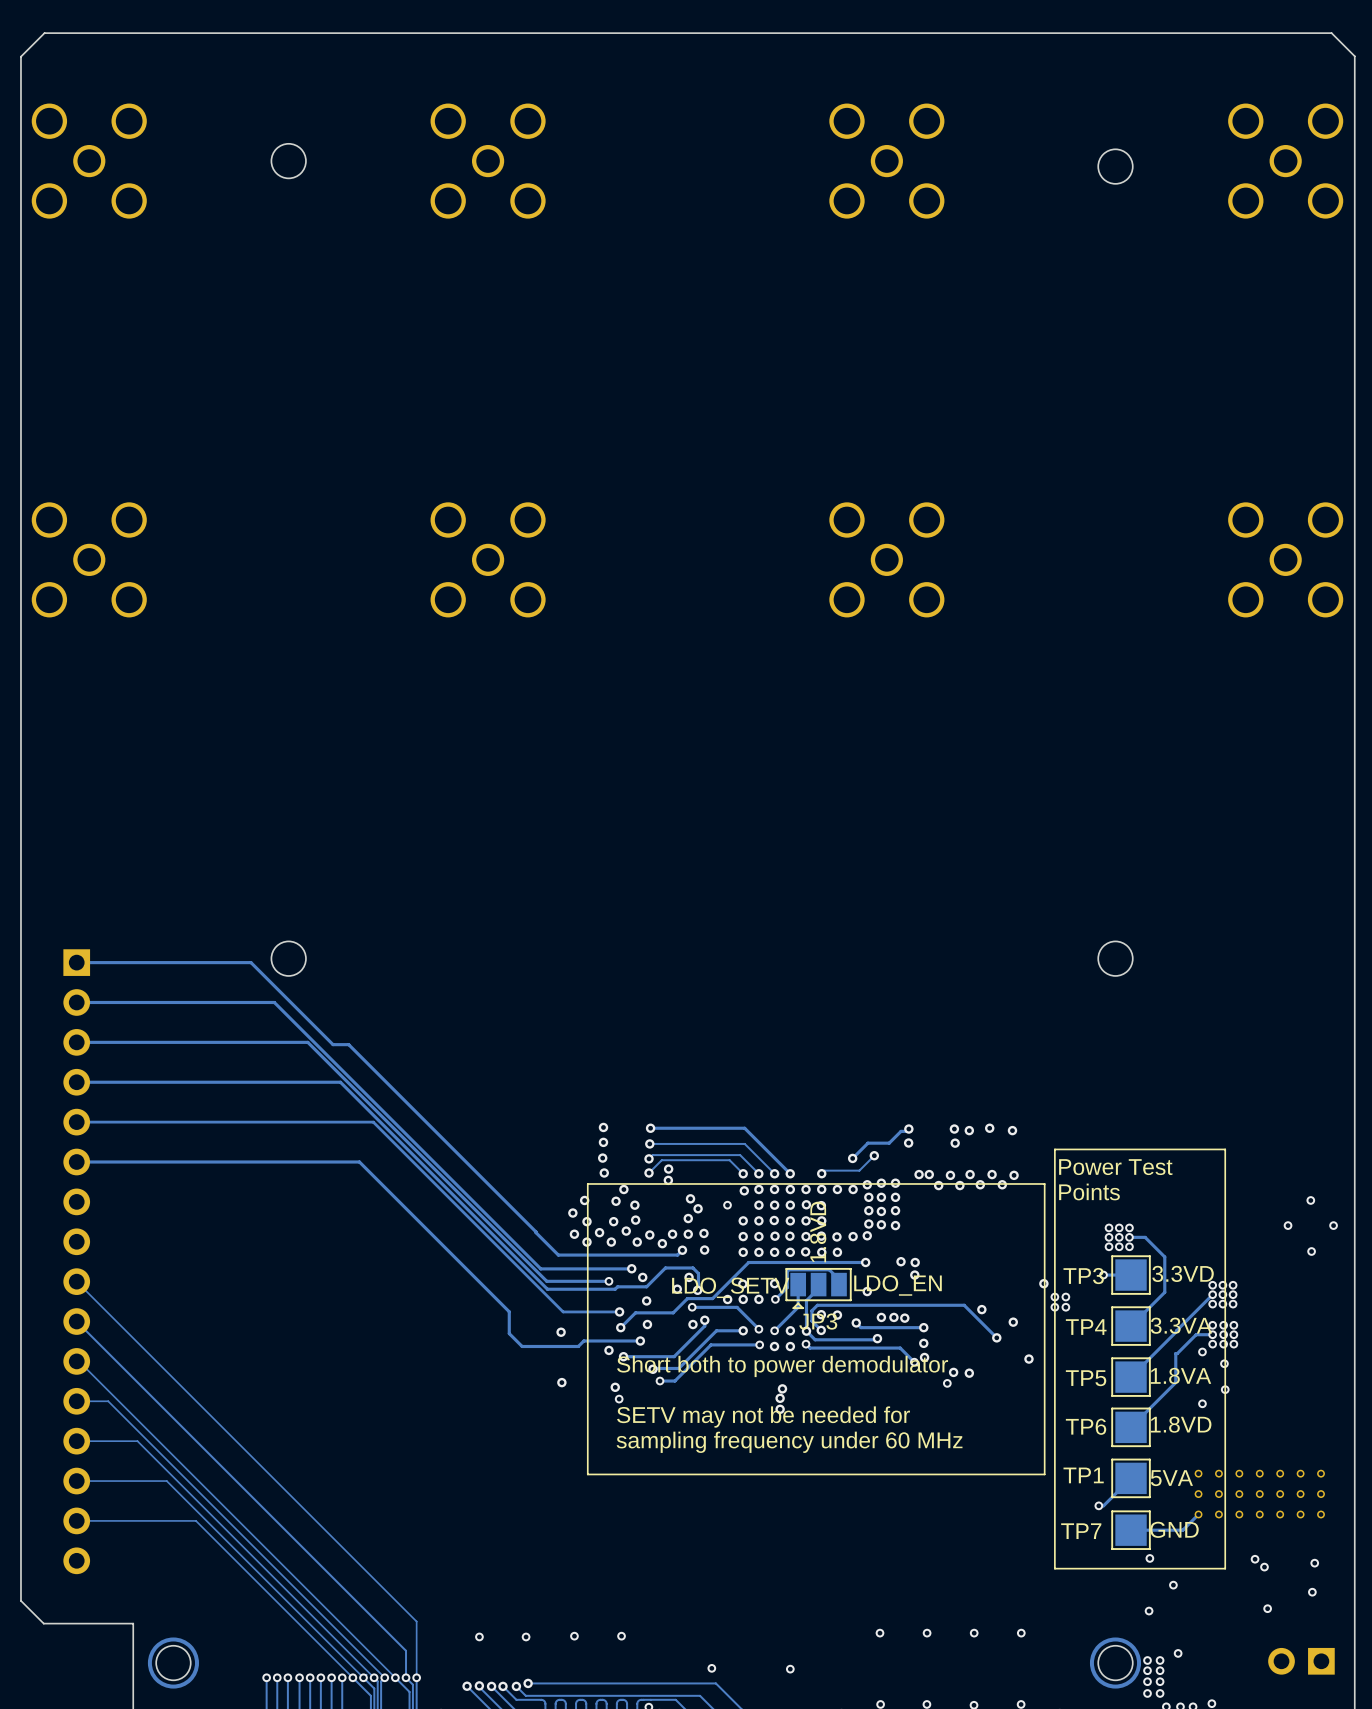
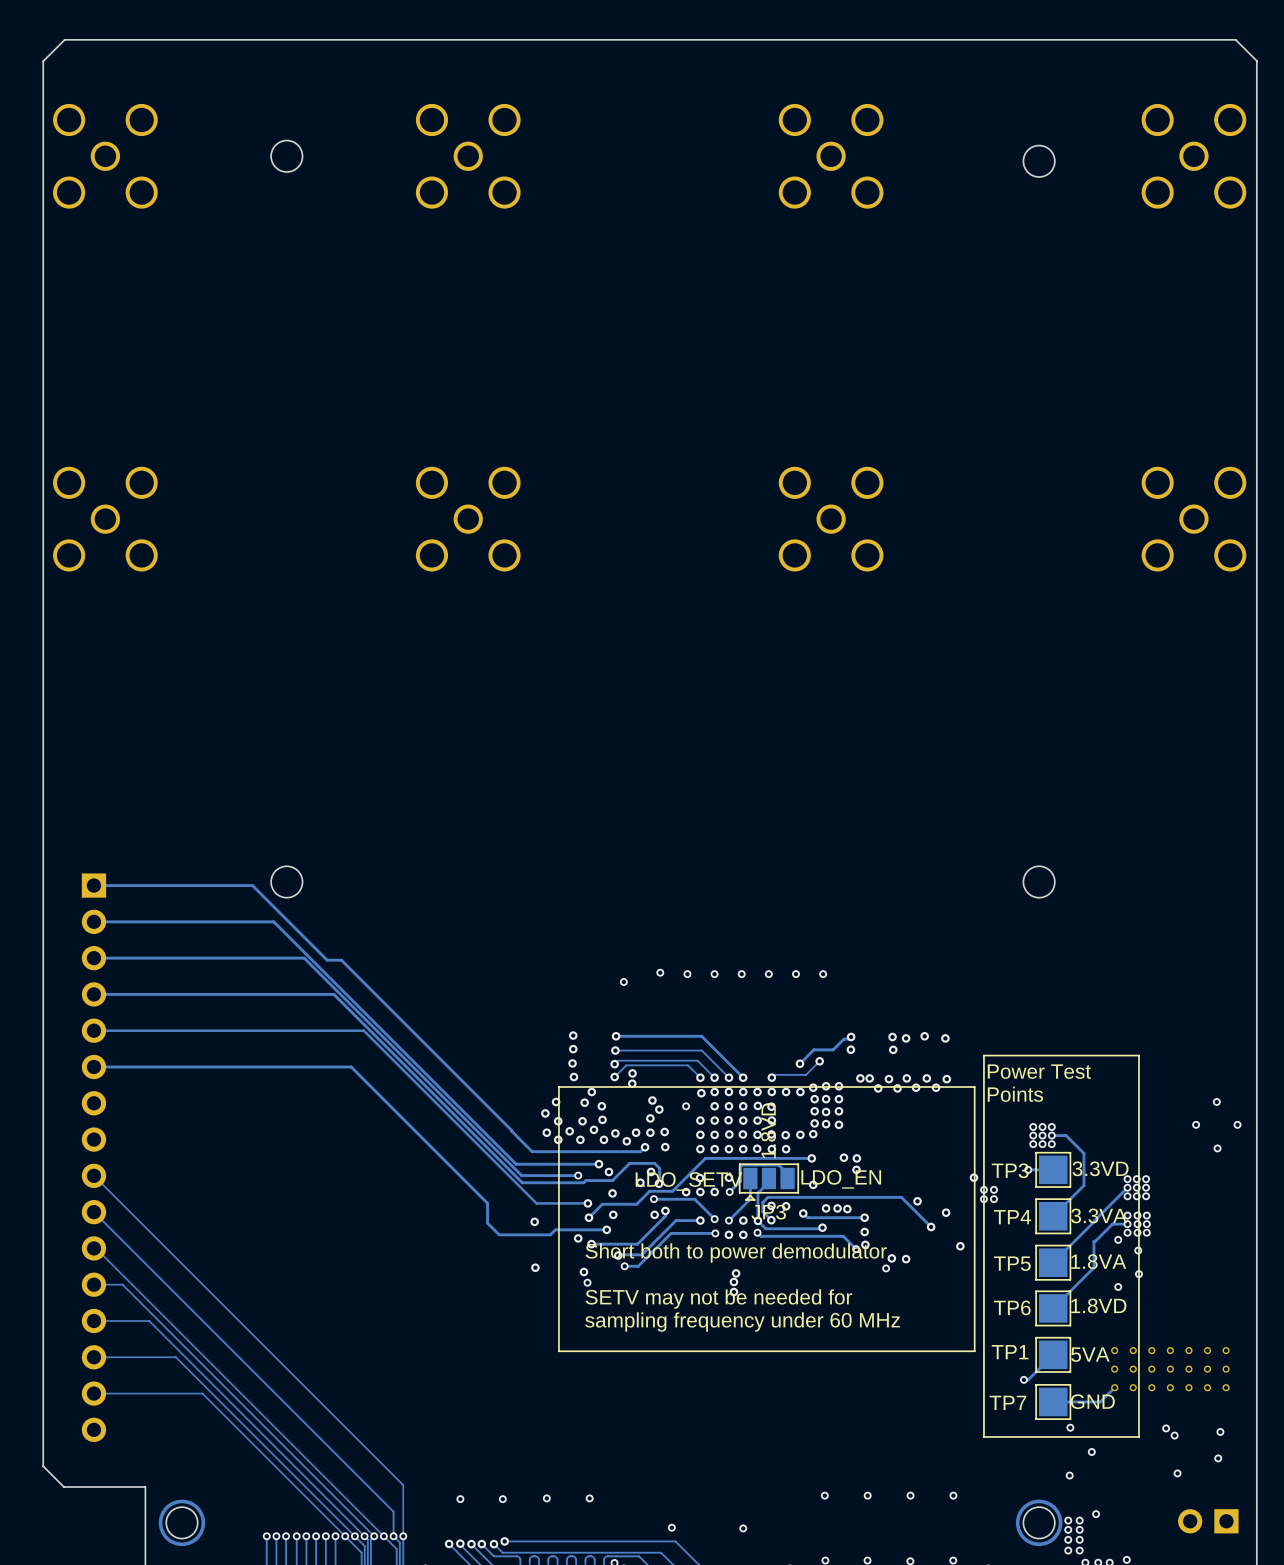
via: none -> (660, 972)
via: none -> (687, 974)
via: none -> (714, 974)
via: none -> (741, 974)
via: none -> (768, 974)
via: none -> (796, 974)
via: none -> (823, 974)
via: none -> (623, 981)

